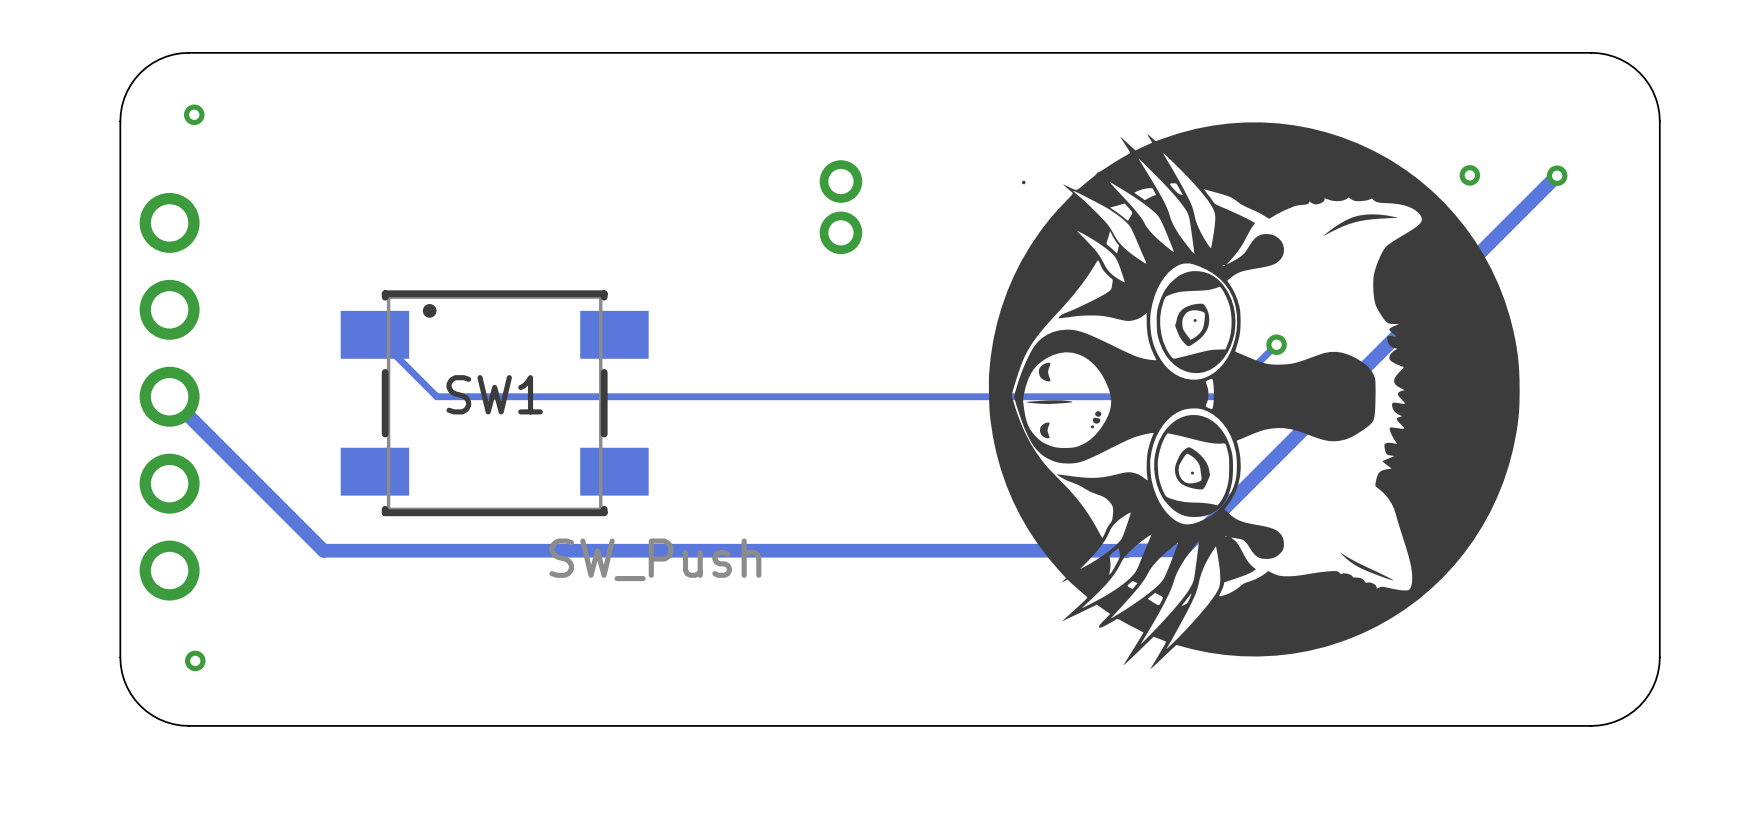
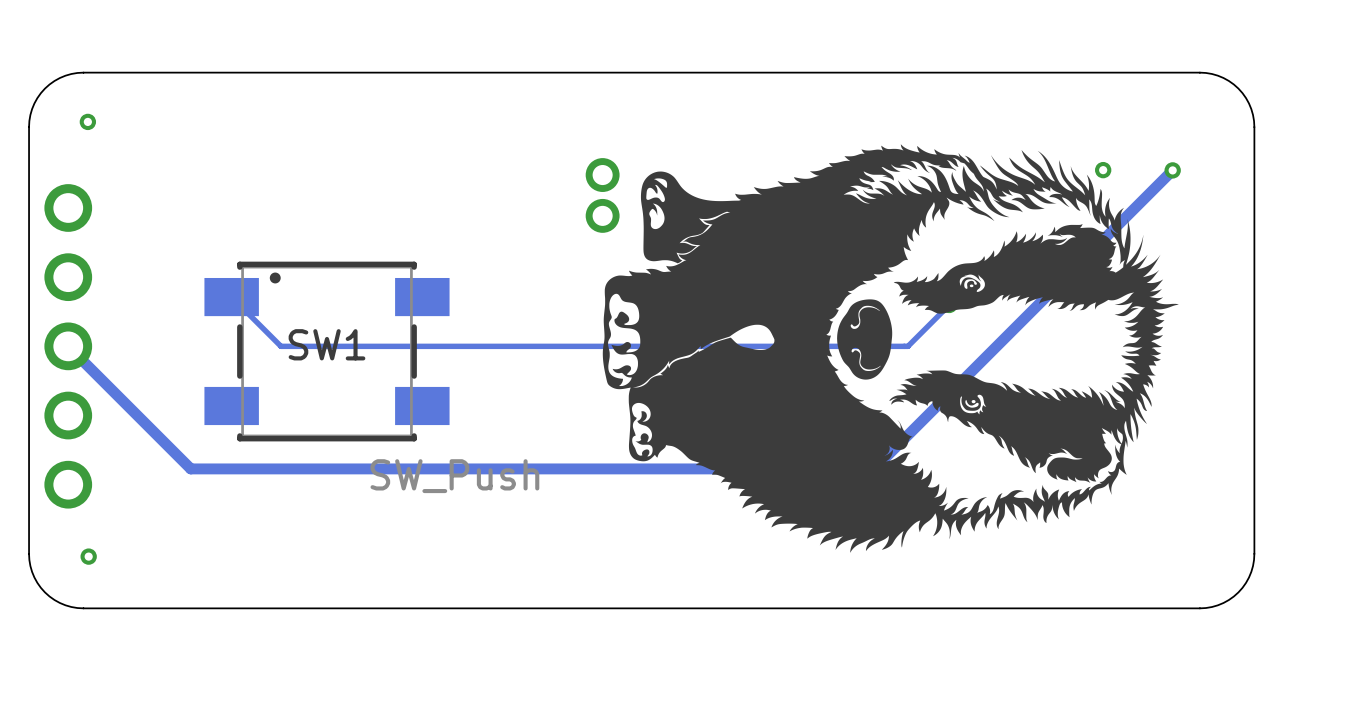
drawing: [988, 122, 1520, 669] -> none
drawing: none -> [602, 144, 1179, 553]

